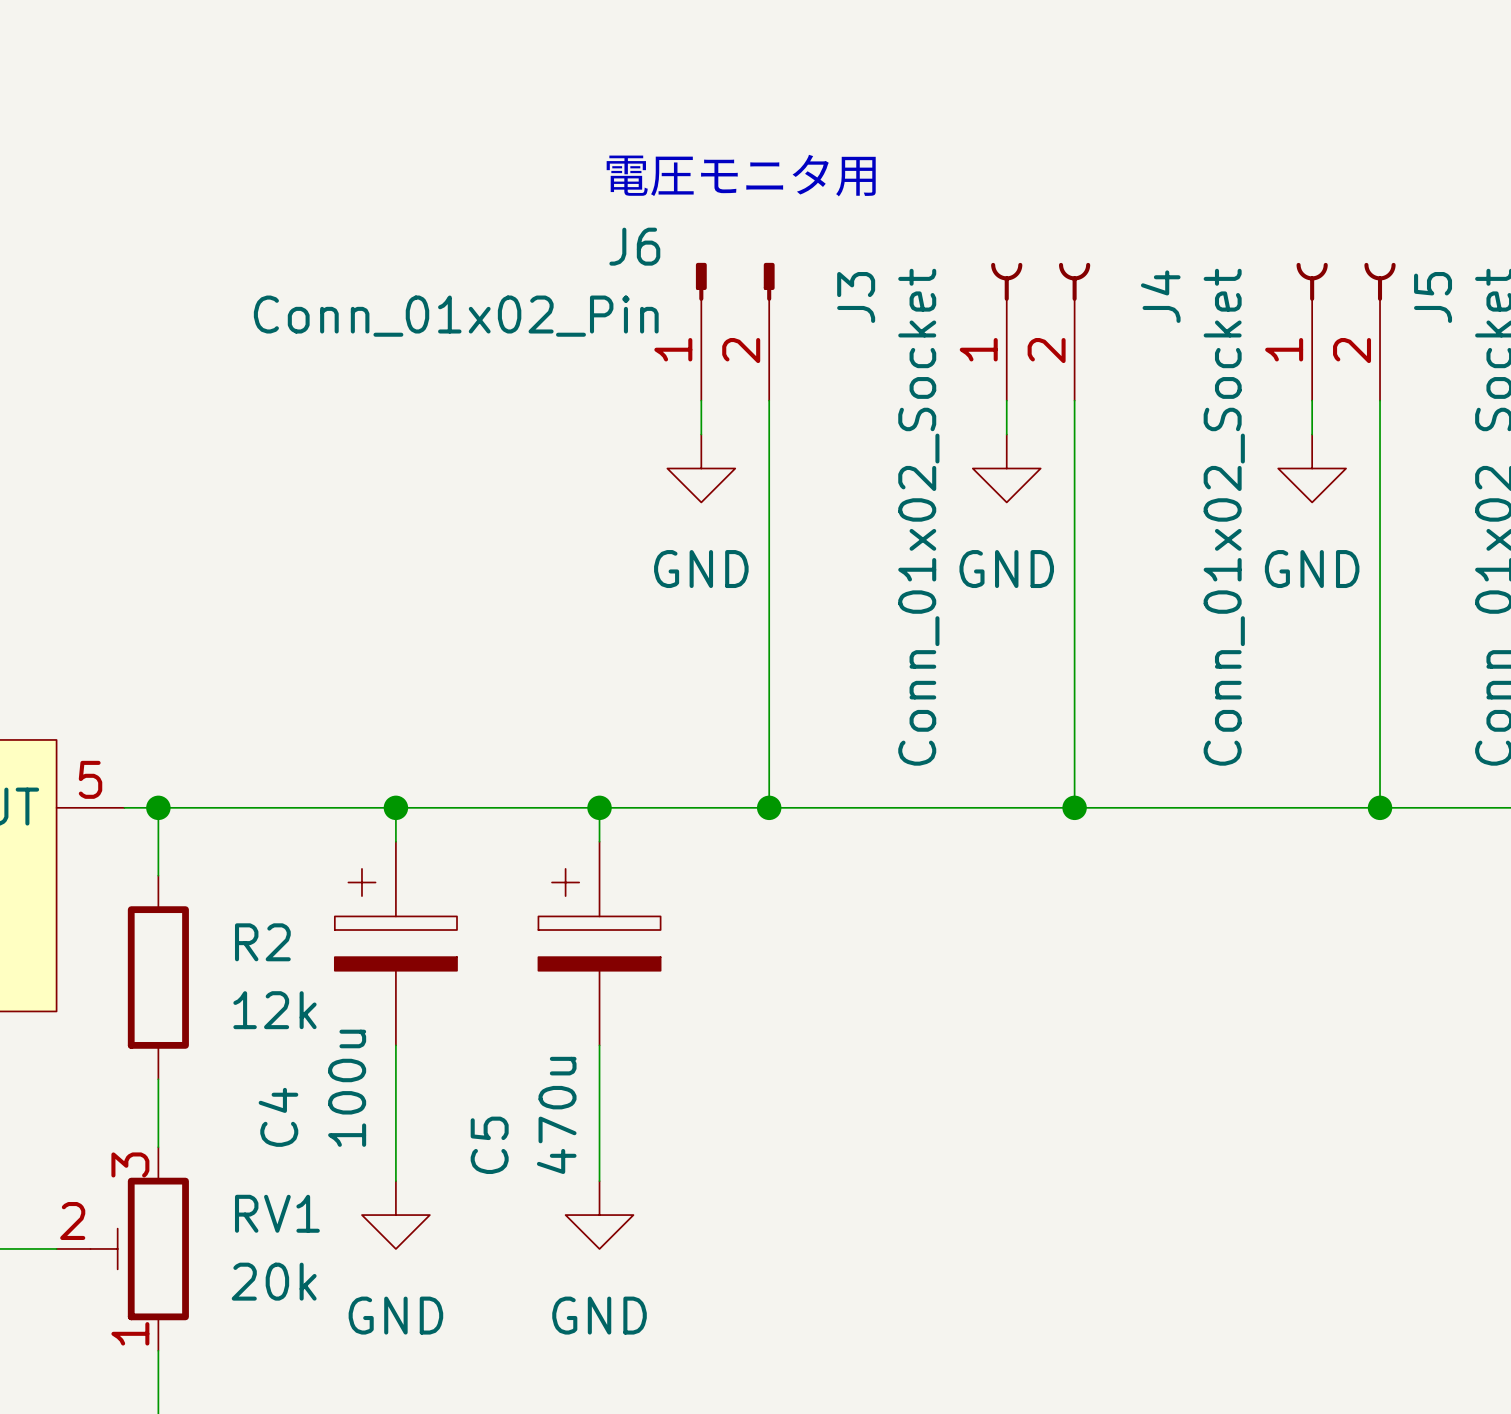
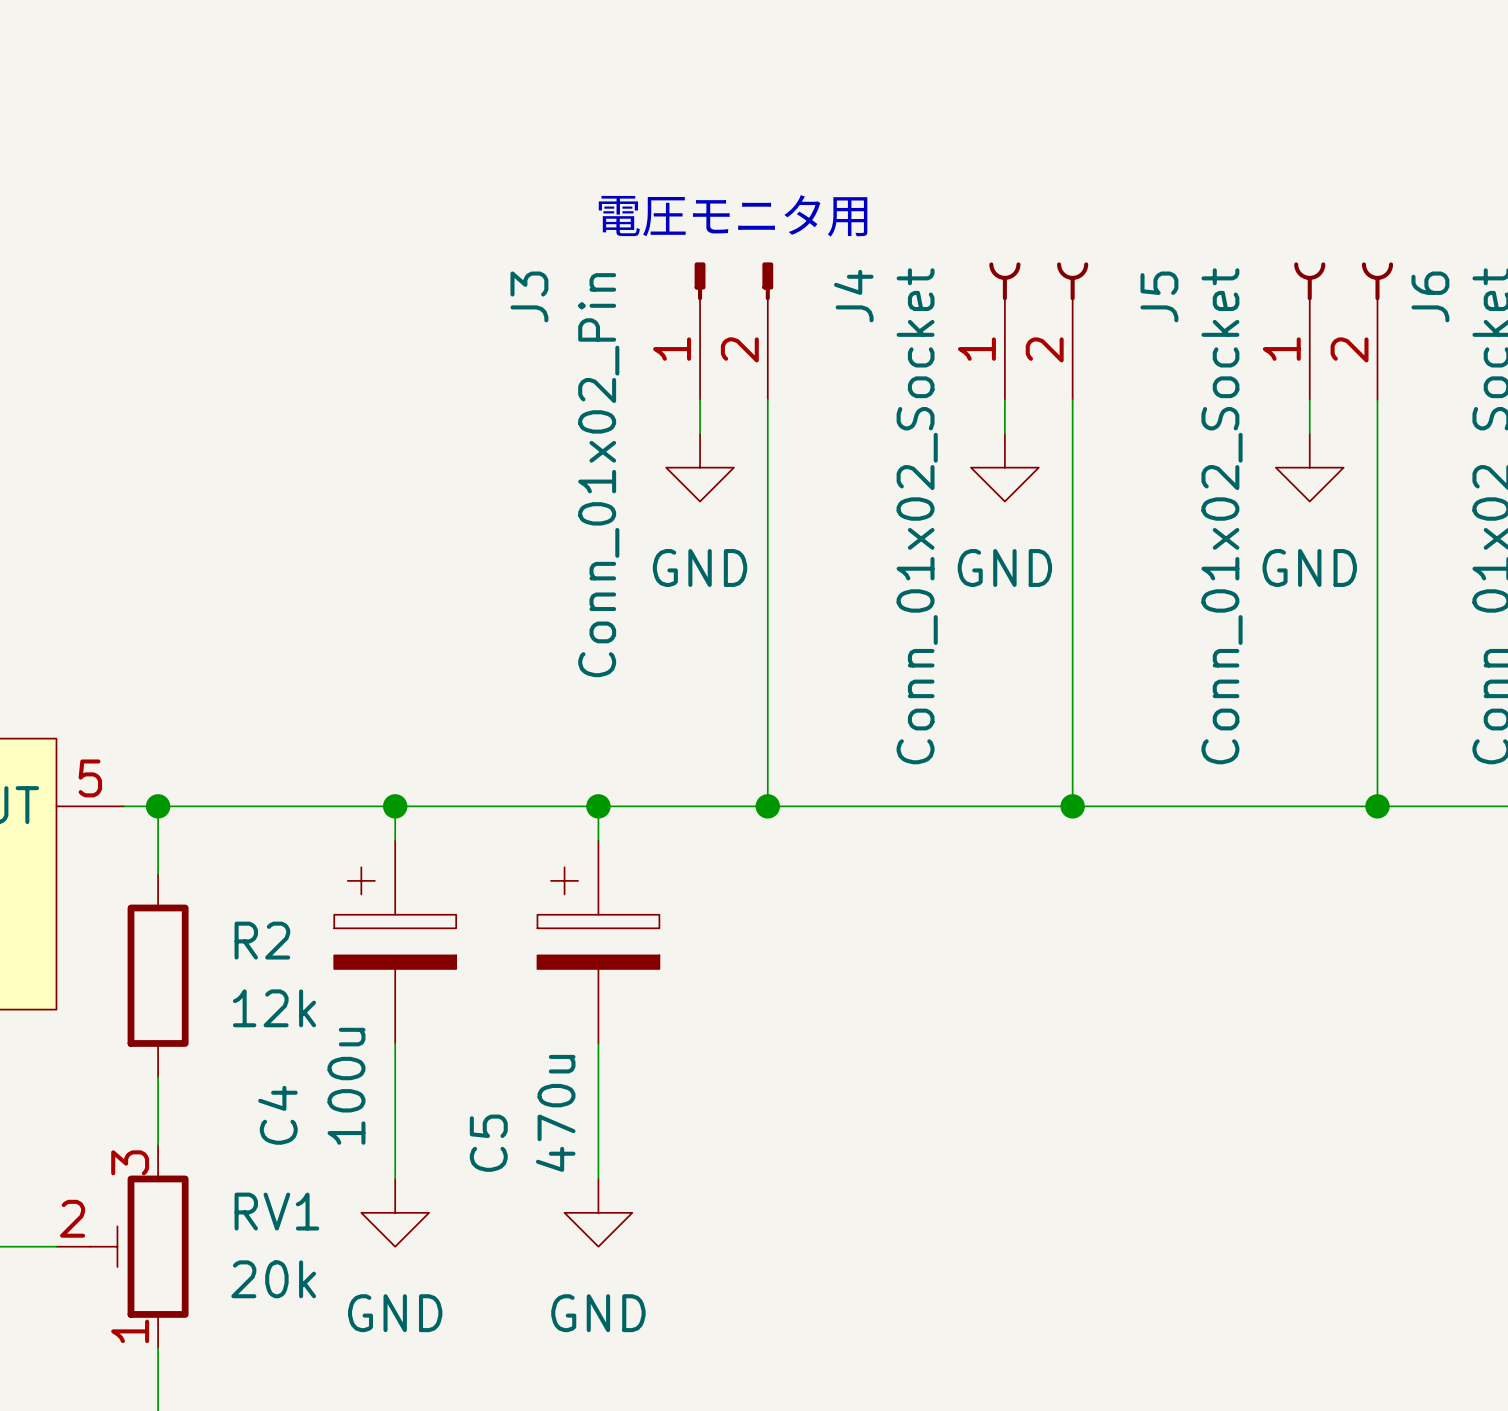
text position: 電圧モニタ用 (741, 175) -> 電圧モニタ用 (733, 215)
J6 name: J6 (634, 246) -> J3 (529, 296)
J4 name: J4 (1160, 296) -> J5 (1159, 296)
J3 name: J3 (856, 297) -> J4 (853, 296)
J5 name: J5 (1433, 297) -> J6 (1430, 296)
J6 value rotation: 0° (456, 316) -> 90° counterclockwise (598, 475)

